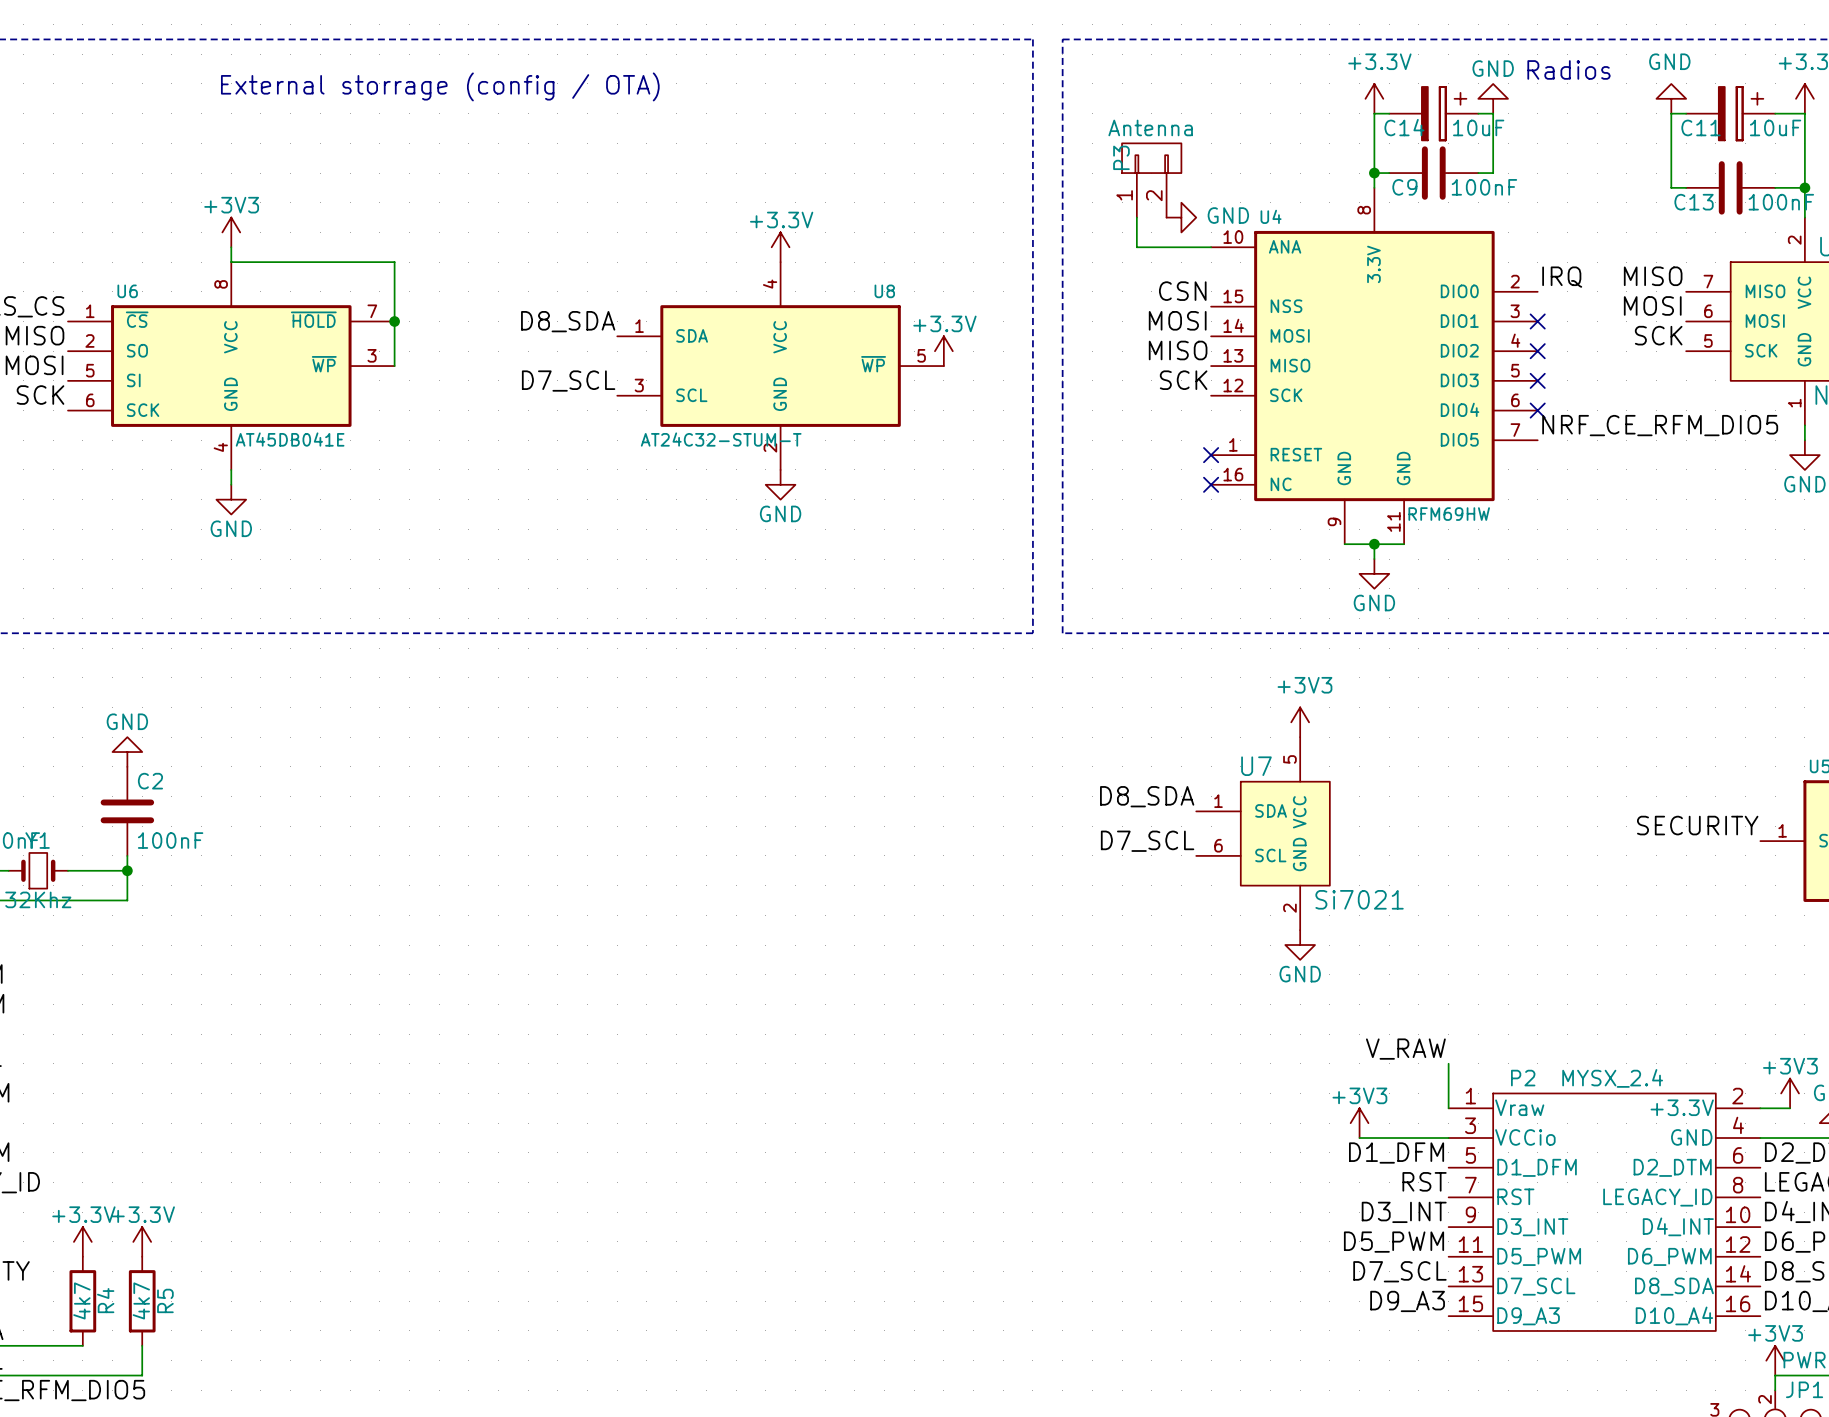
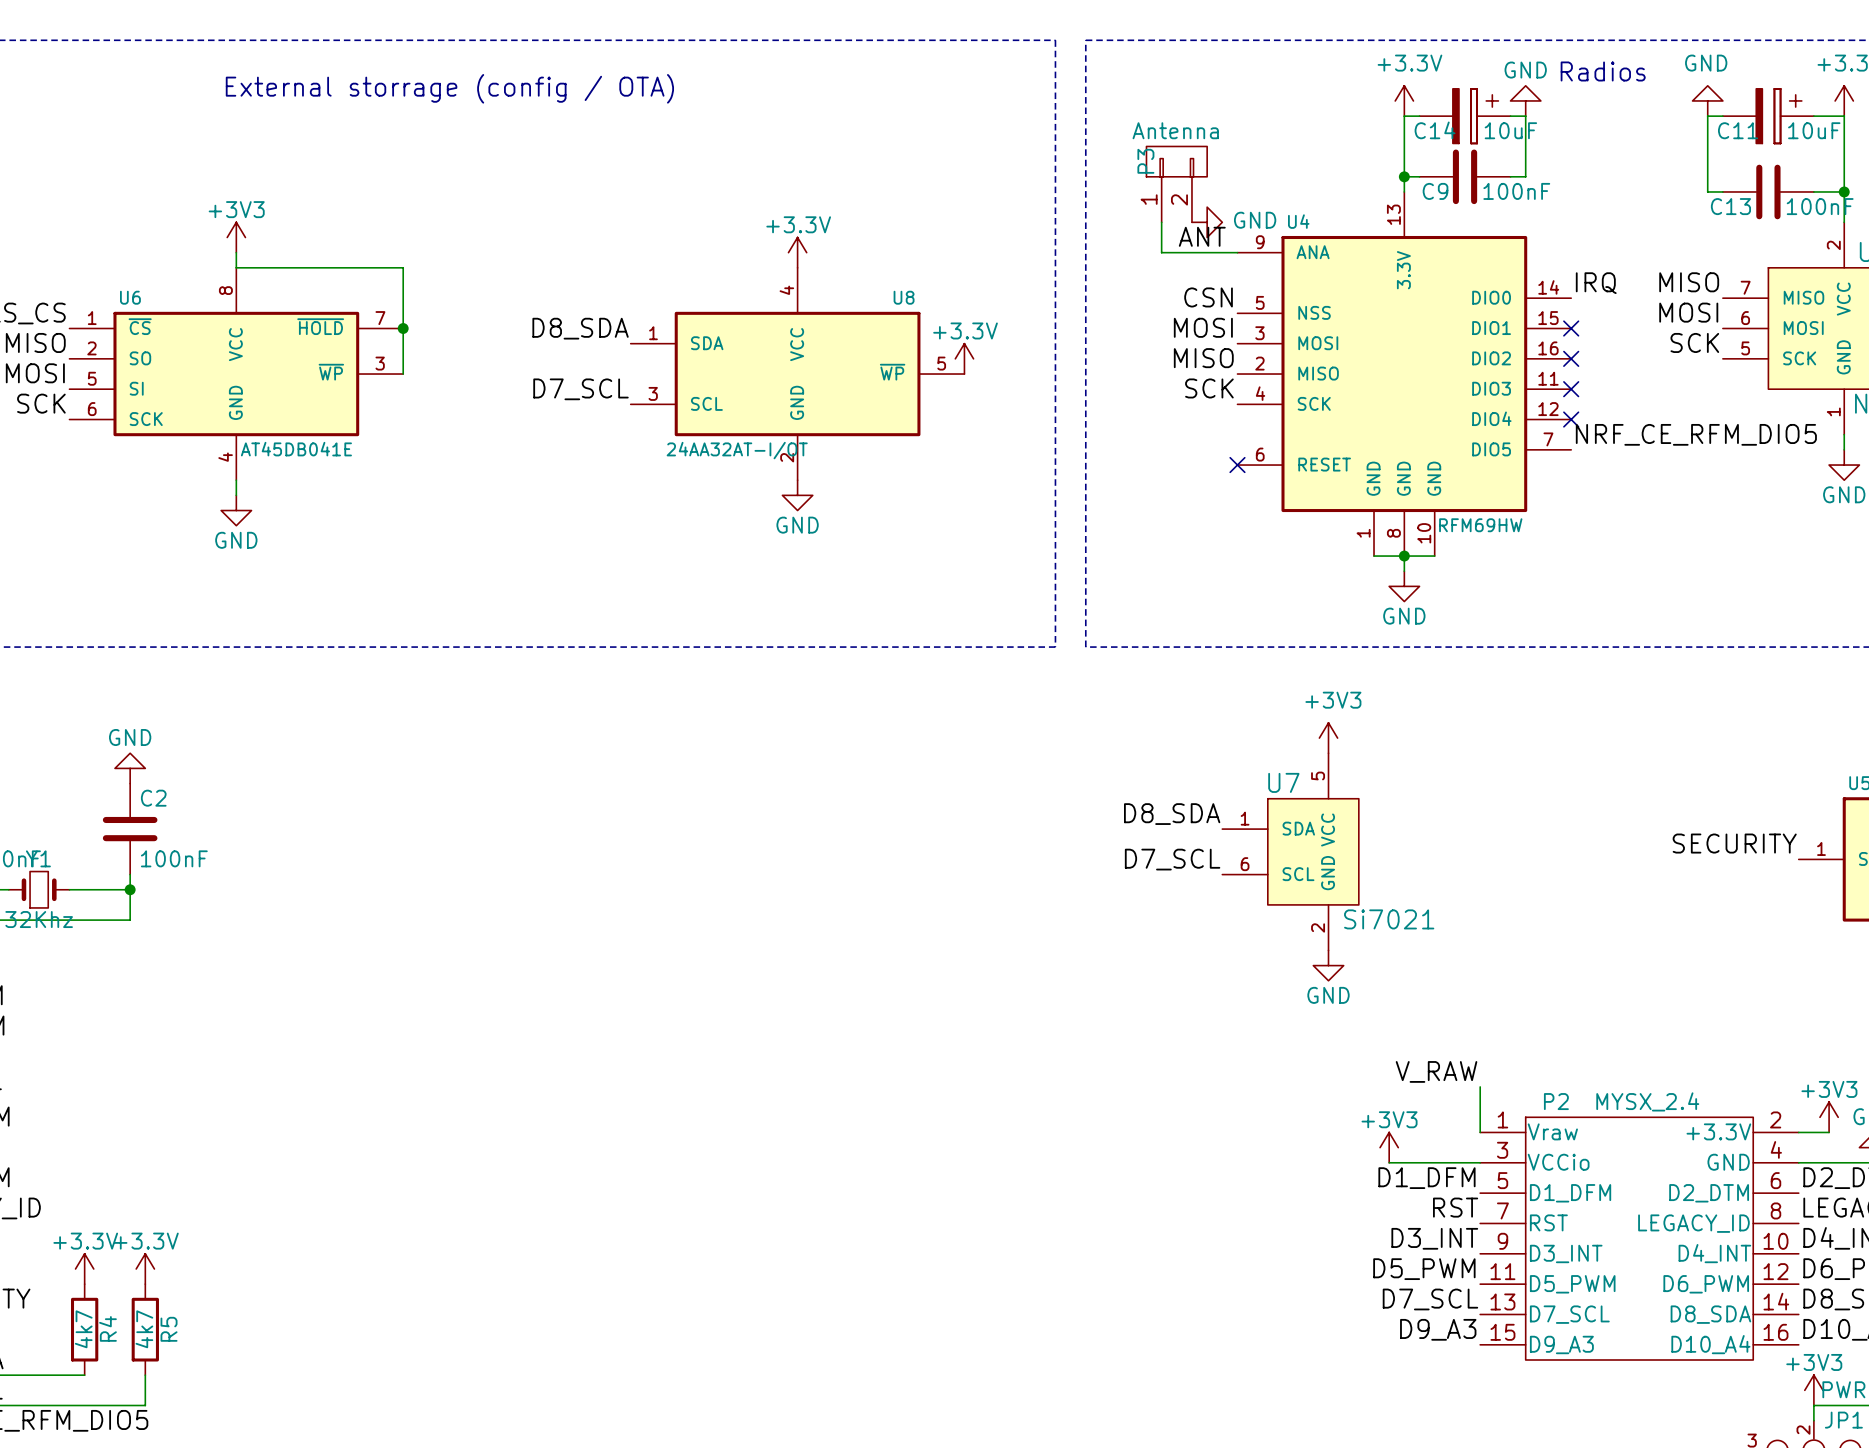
U4 symbol: [1211, 187, 1538, 545] -> [1237, 191, 1572, 557]
label: none -> ANT (1202, 236)
U8 value: AT24C32-STUM-T (721, 439) -> 24AA32AT-I/OT (737, 450)
no-connect mark: (1211, 484) -> none

